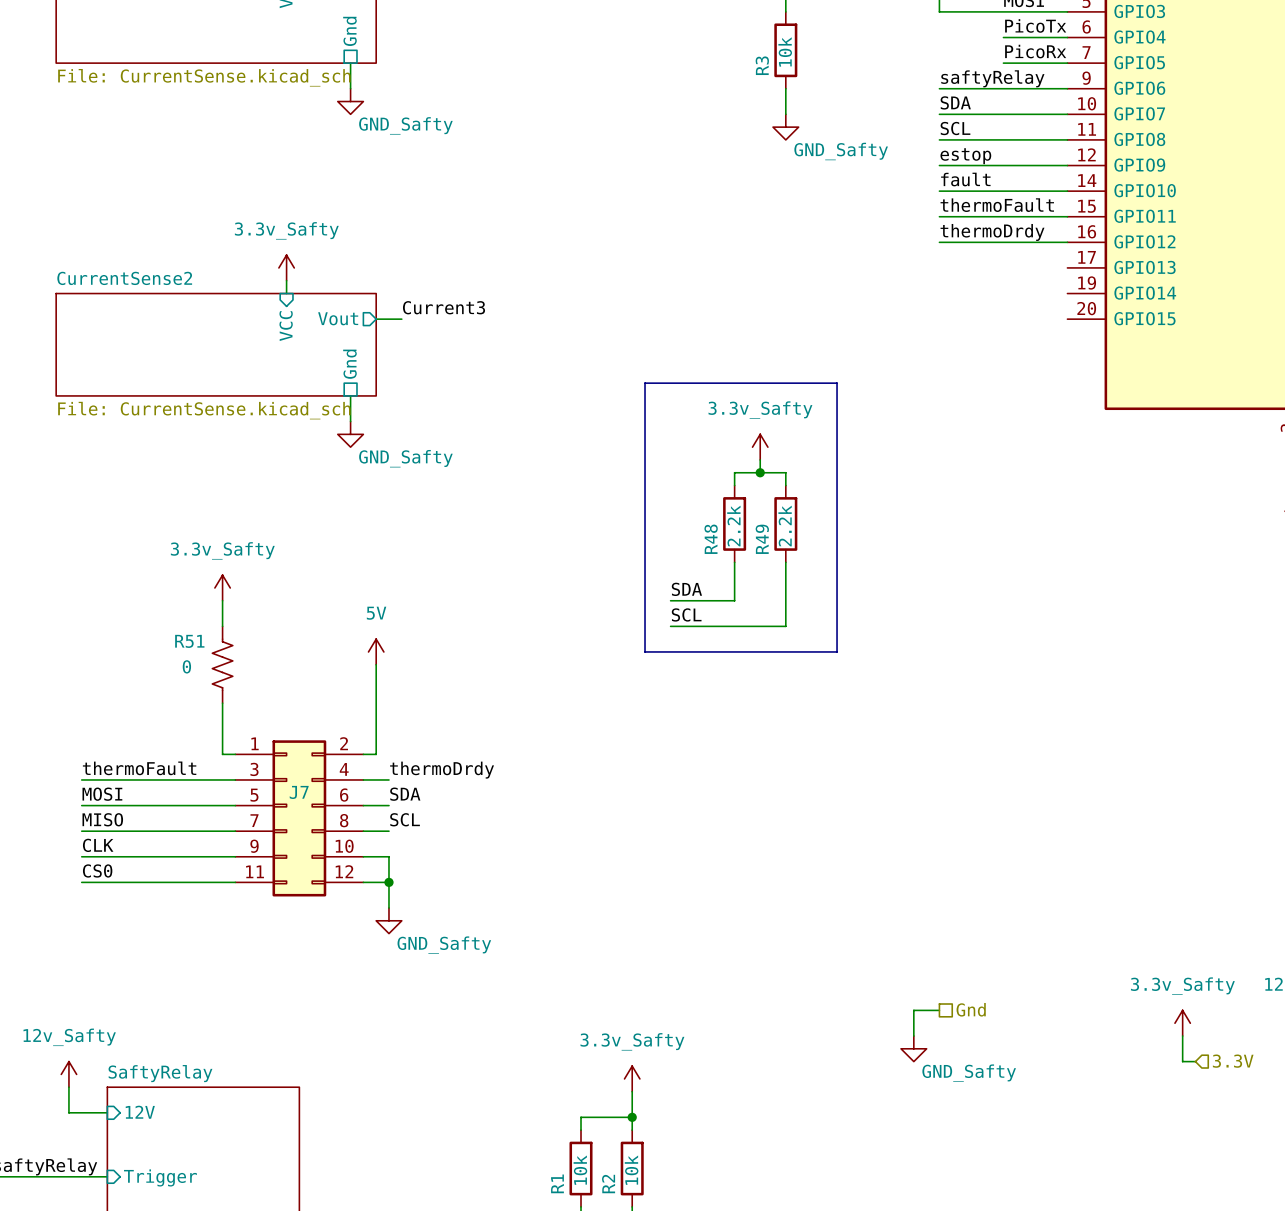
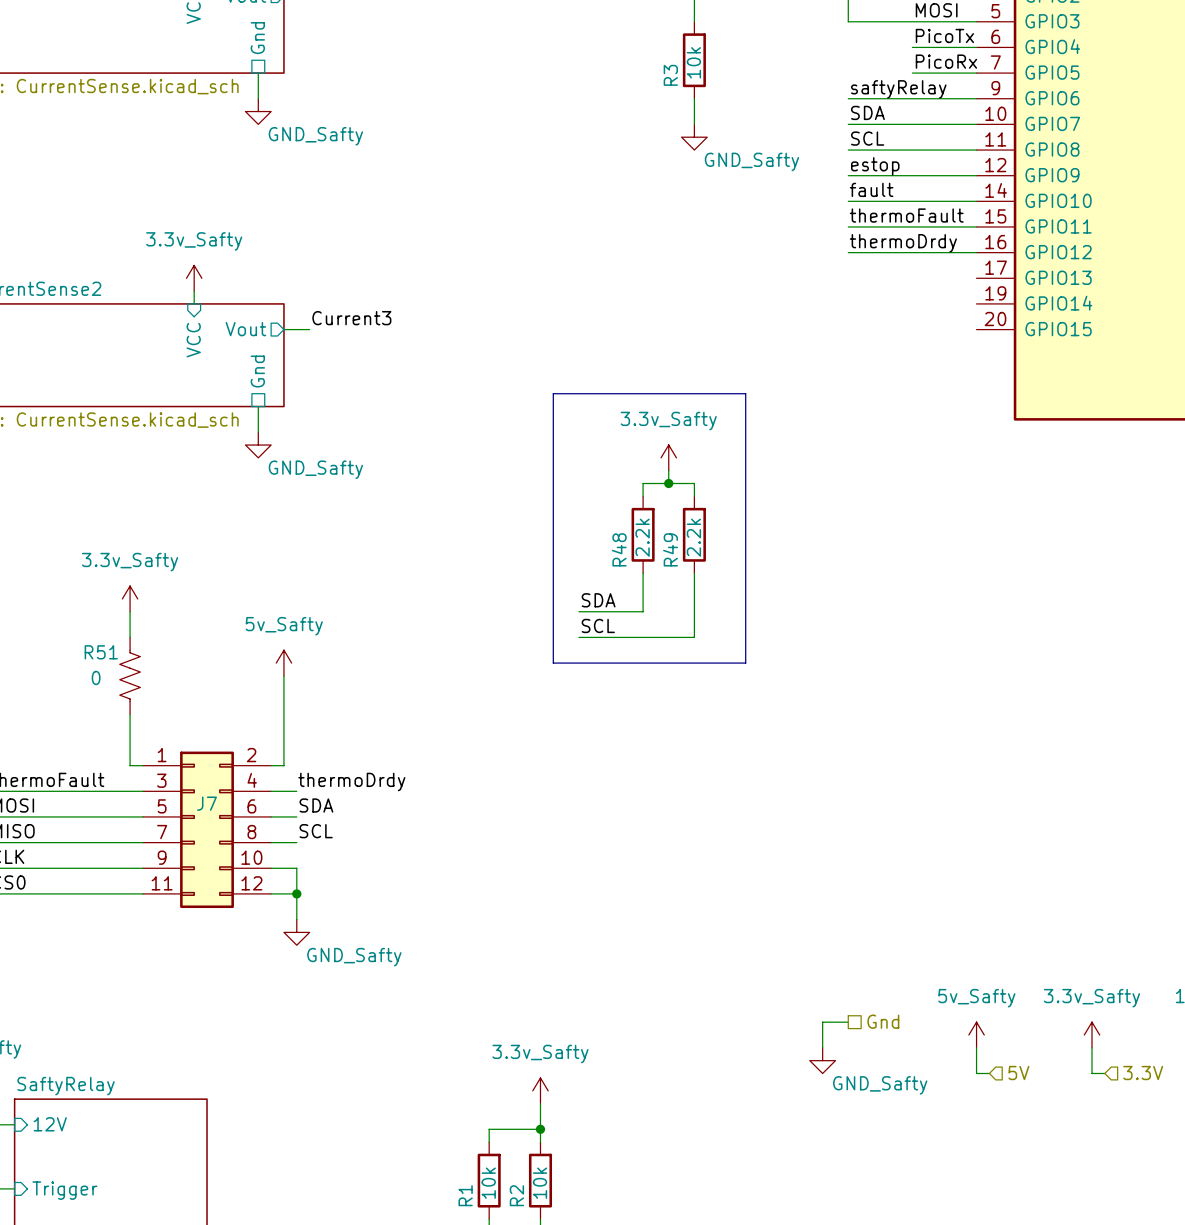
power symbol: 5V (376, 651) -> 5v_Safty (283, 663)
power symbol: none -> 5v_Safty (976, 1035)
wire: none -> (976, 1047) (976, 1073) (989, 1073)
hierarchical label: none -> 5V (1018, 1073)

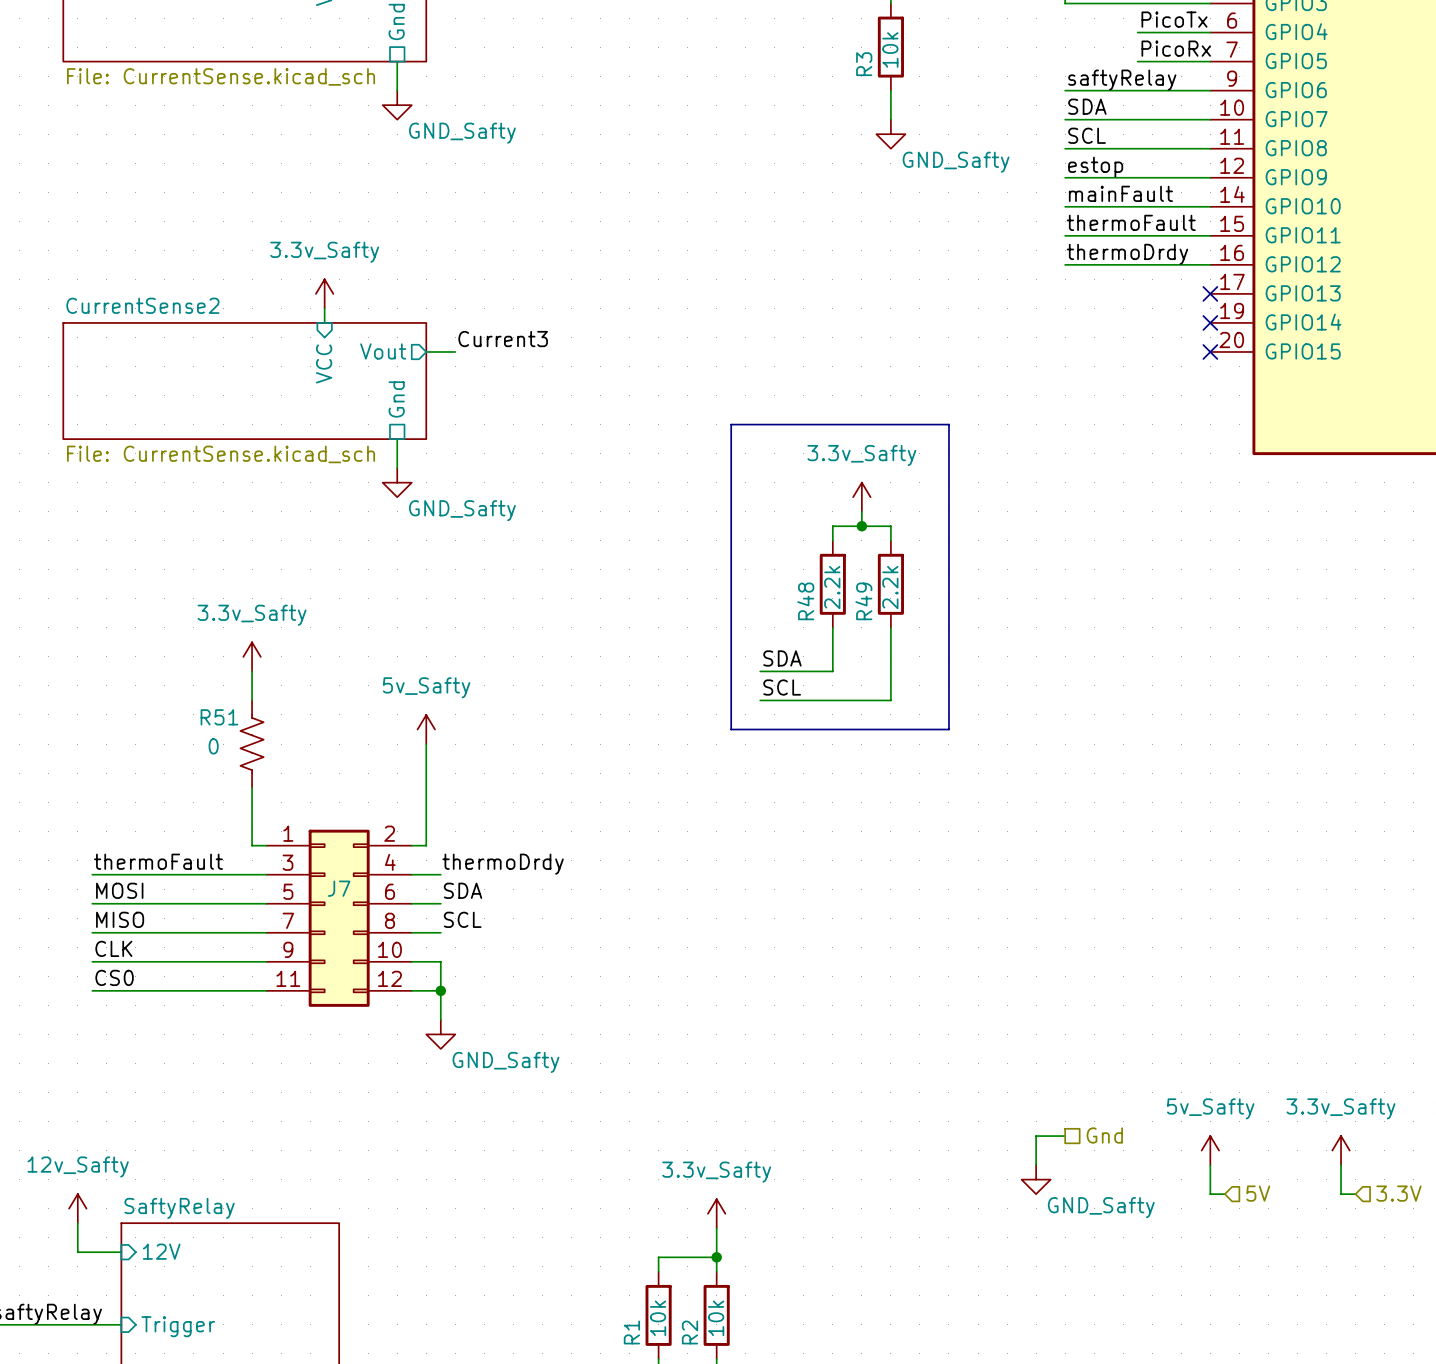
label: fault (871, 189) -> mainFault (1120, 193)
no-connect mark: none -> (1210, 293)
no-connect mark: none -> (1210, 322)
no-connect mark: none -> (1210, 351)

